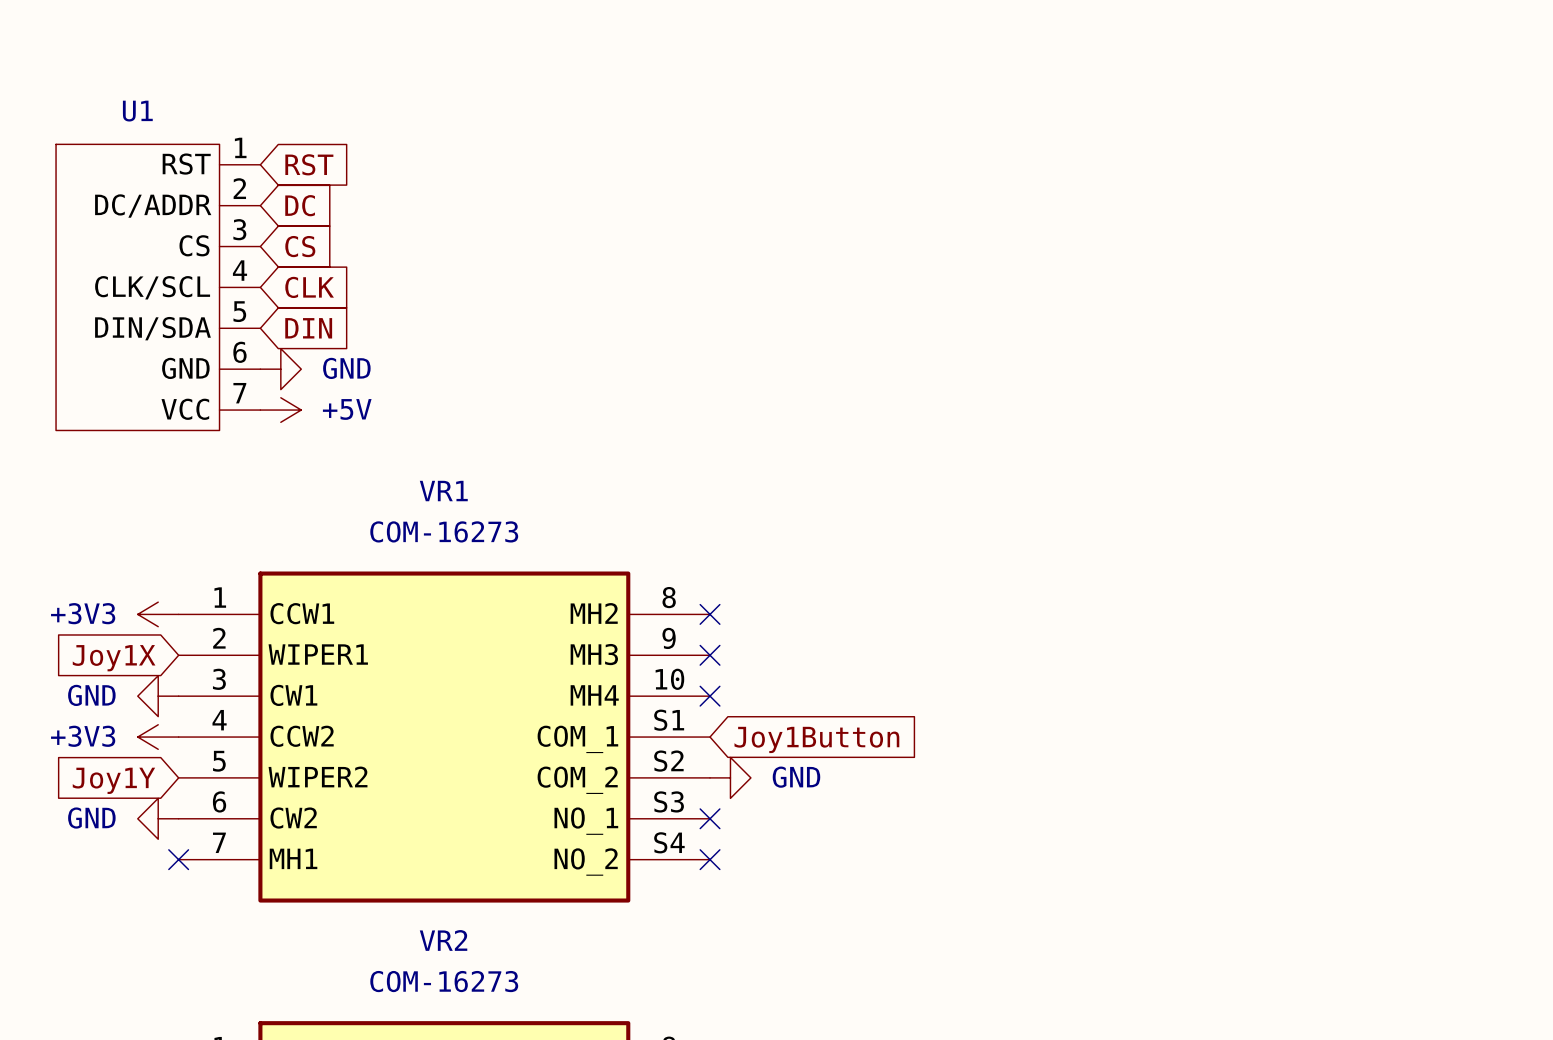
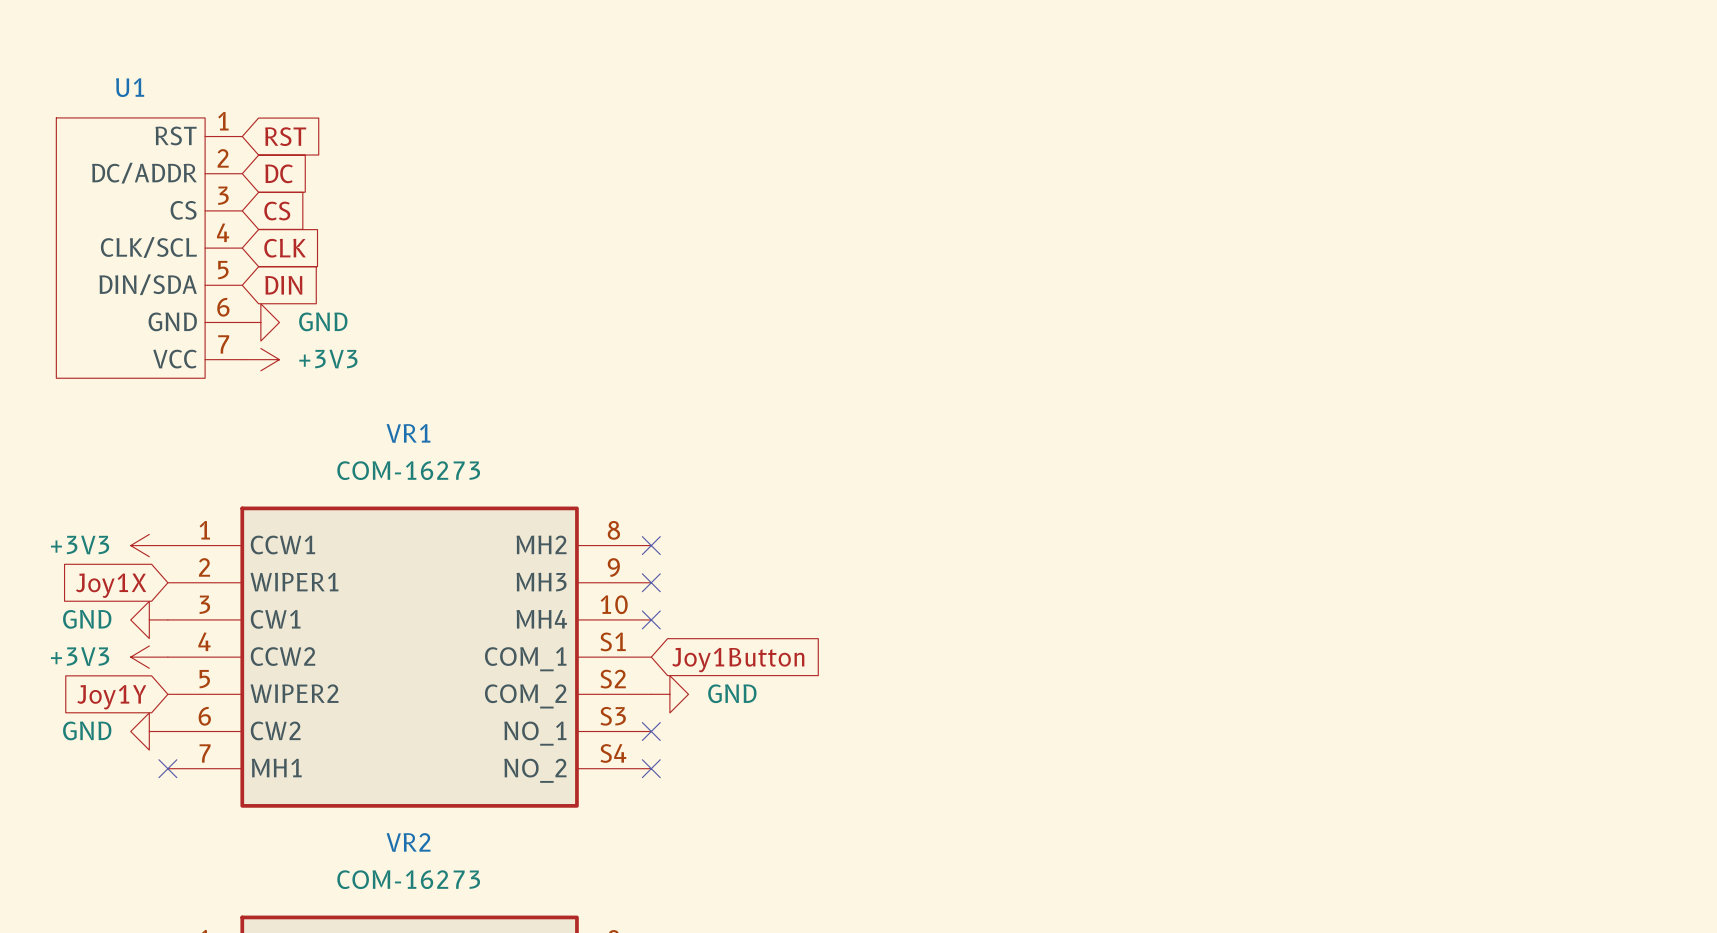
power symbol: +5V (280, 410) -> +3V3 (260, 359)

